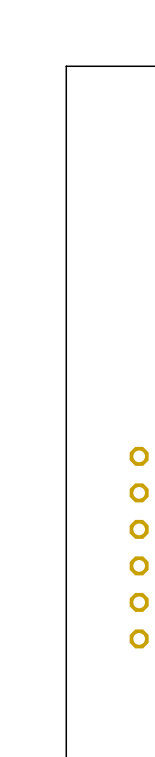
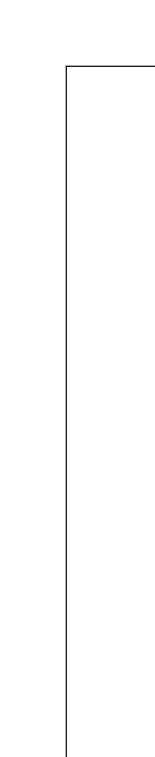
part: (139, 474) -> none
part: (139, 547) -> none
part: (139, 620) -> none

